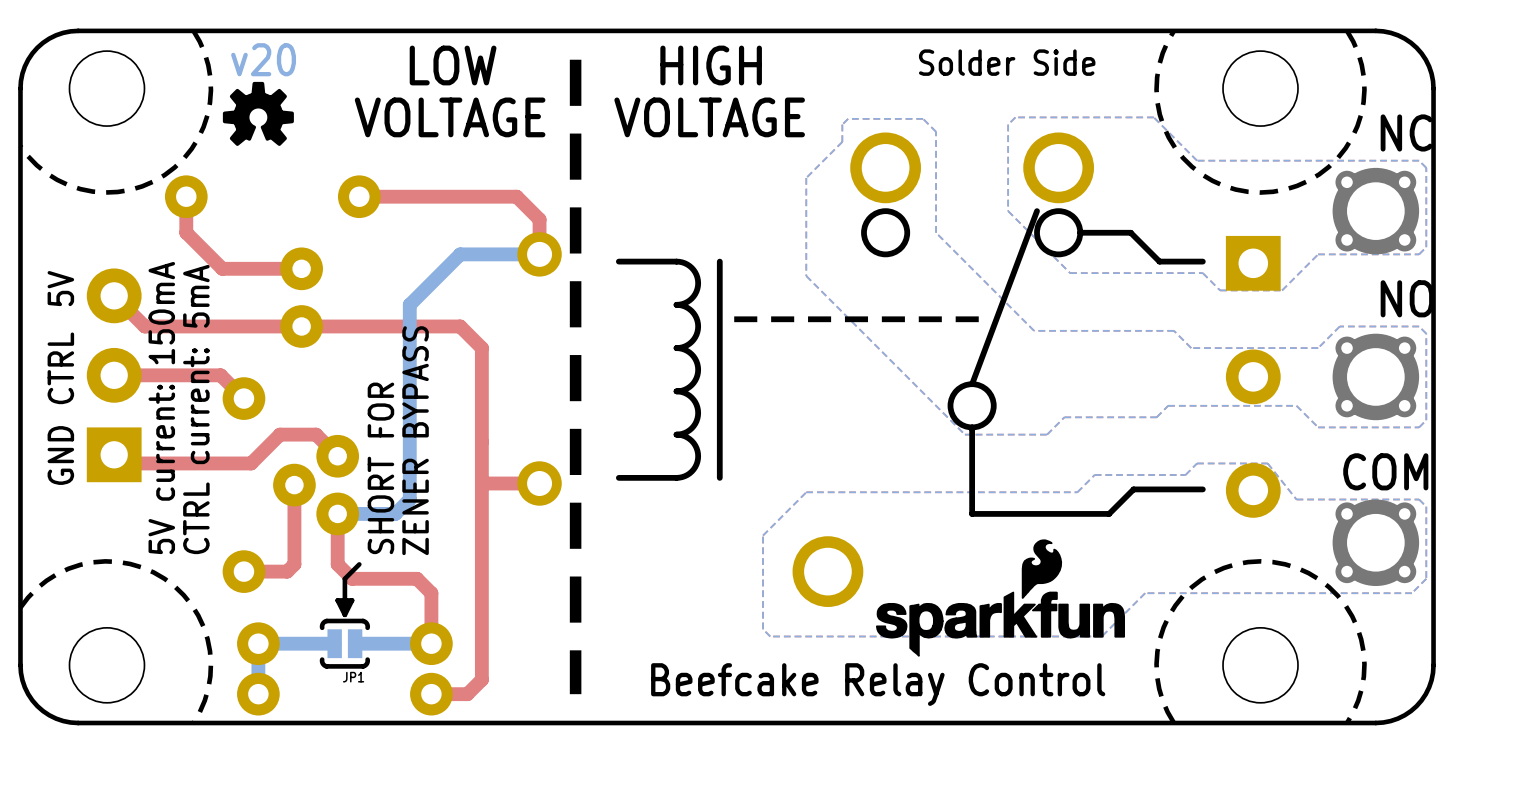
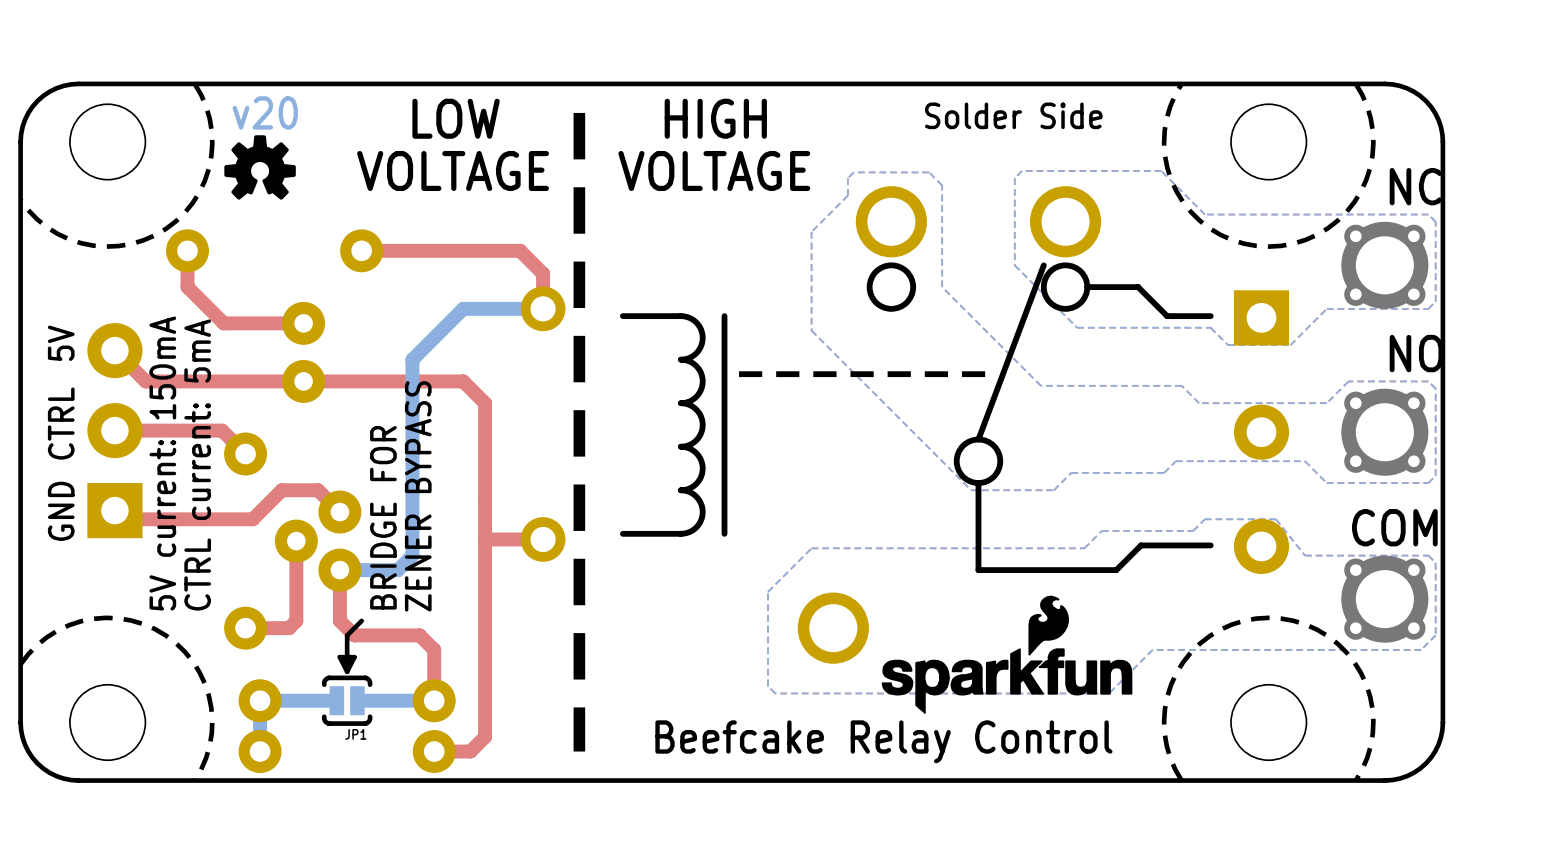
text: SHORT FOR (380, 468) -> BRIDGE FOR (383, 517)

